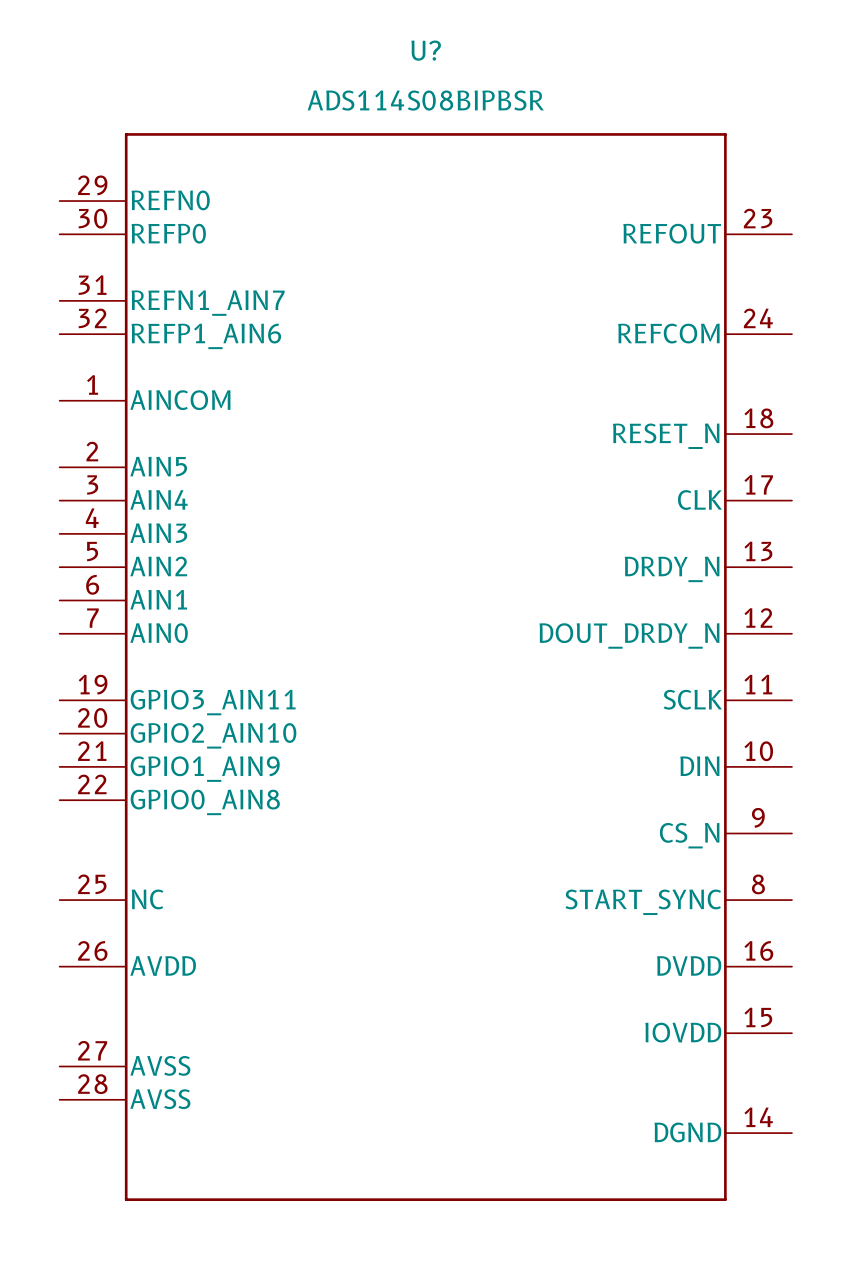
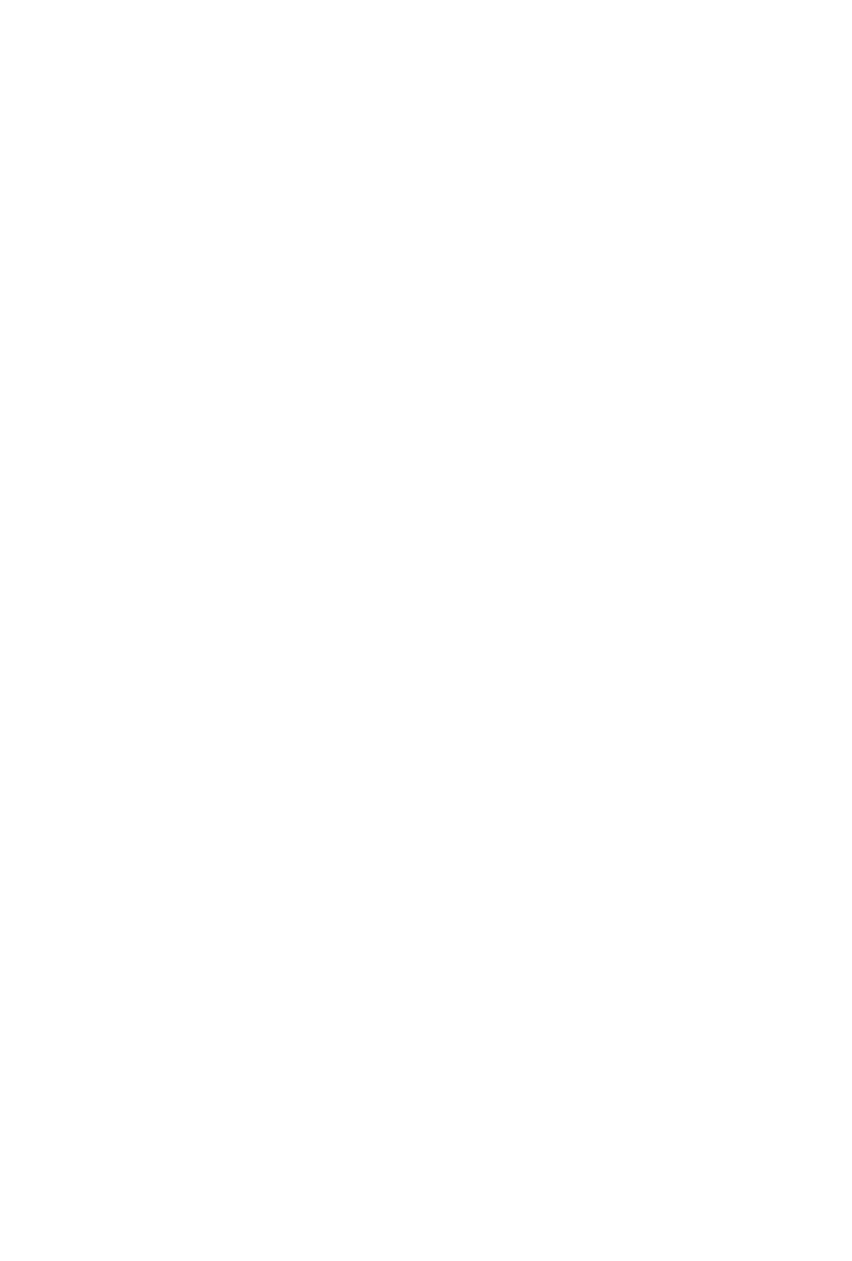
U?: ADS114S08BIPBSR (425, 667) -> none

